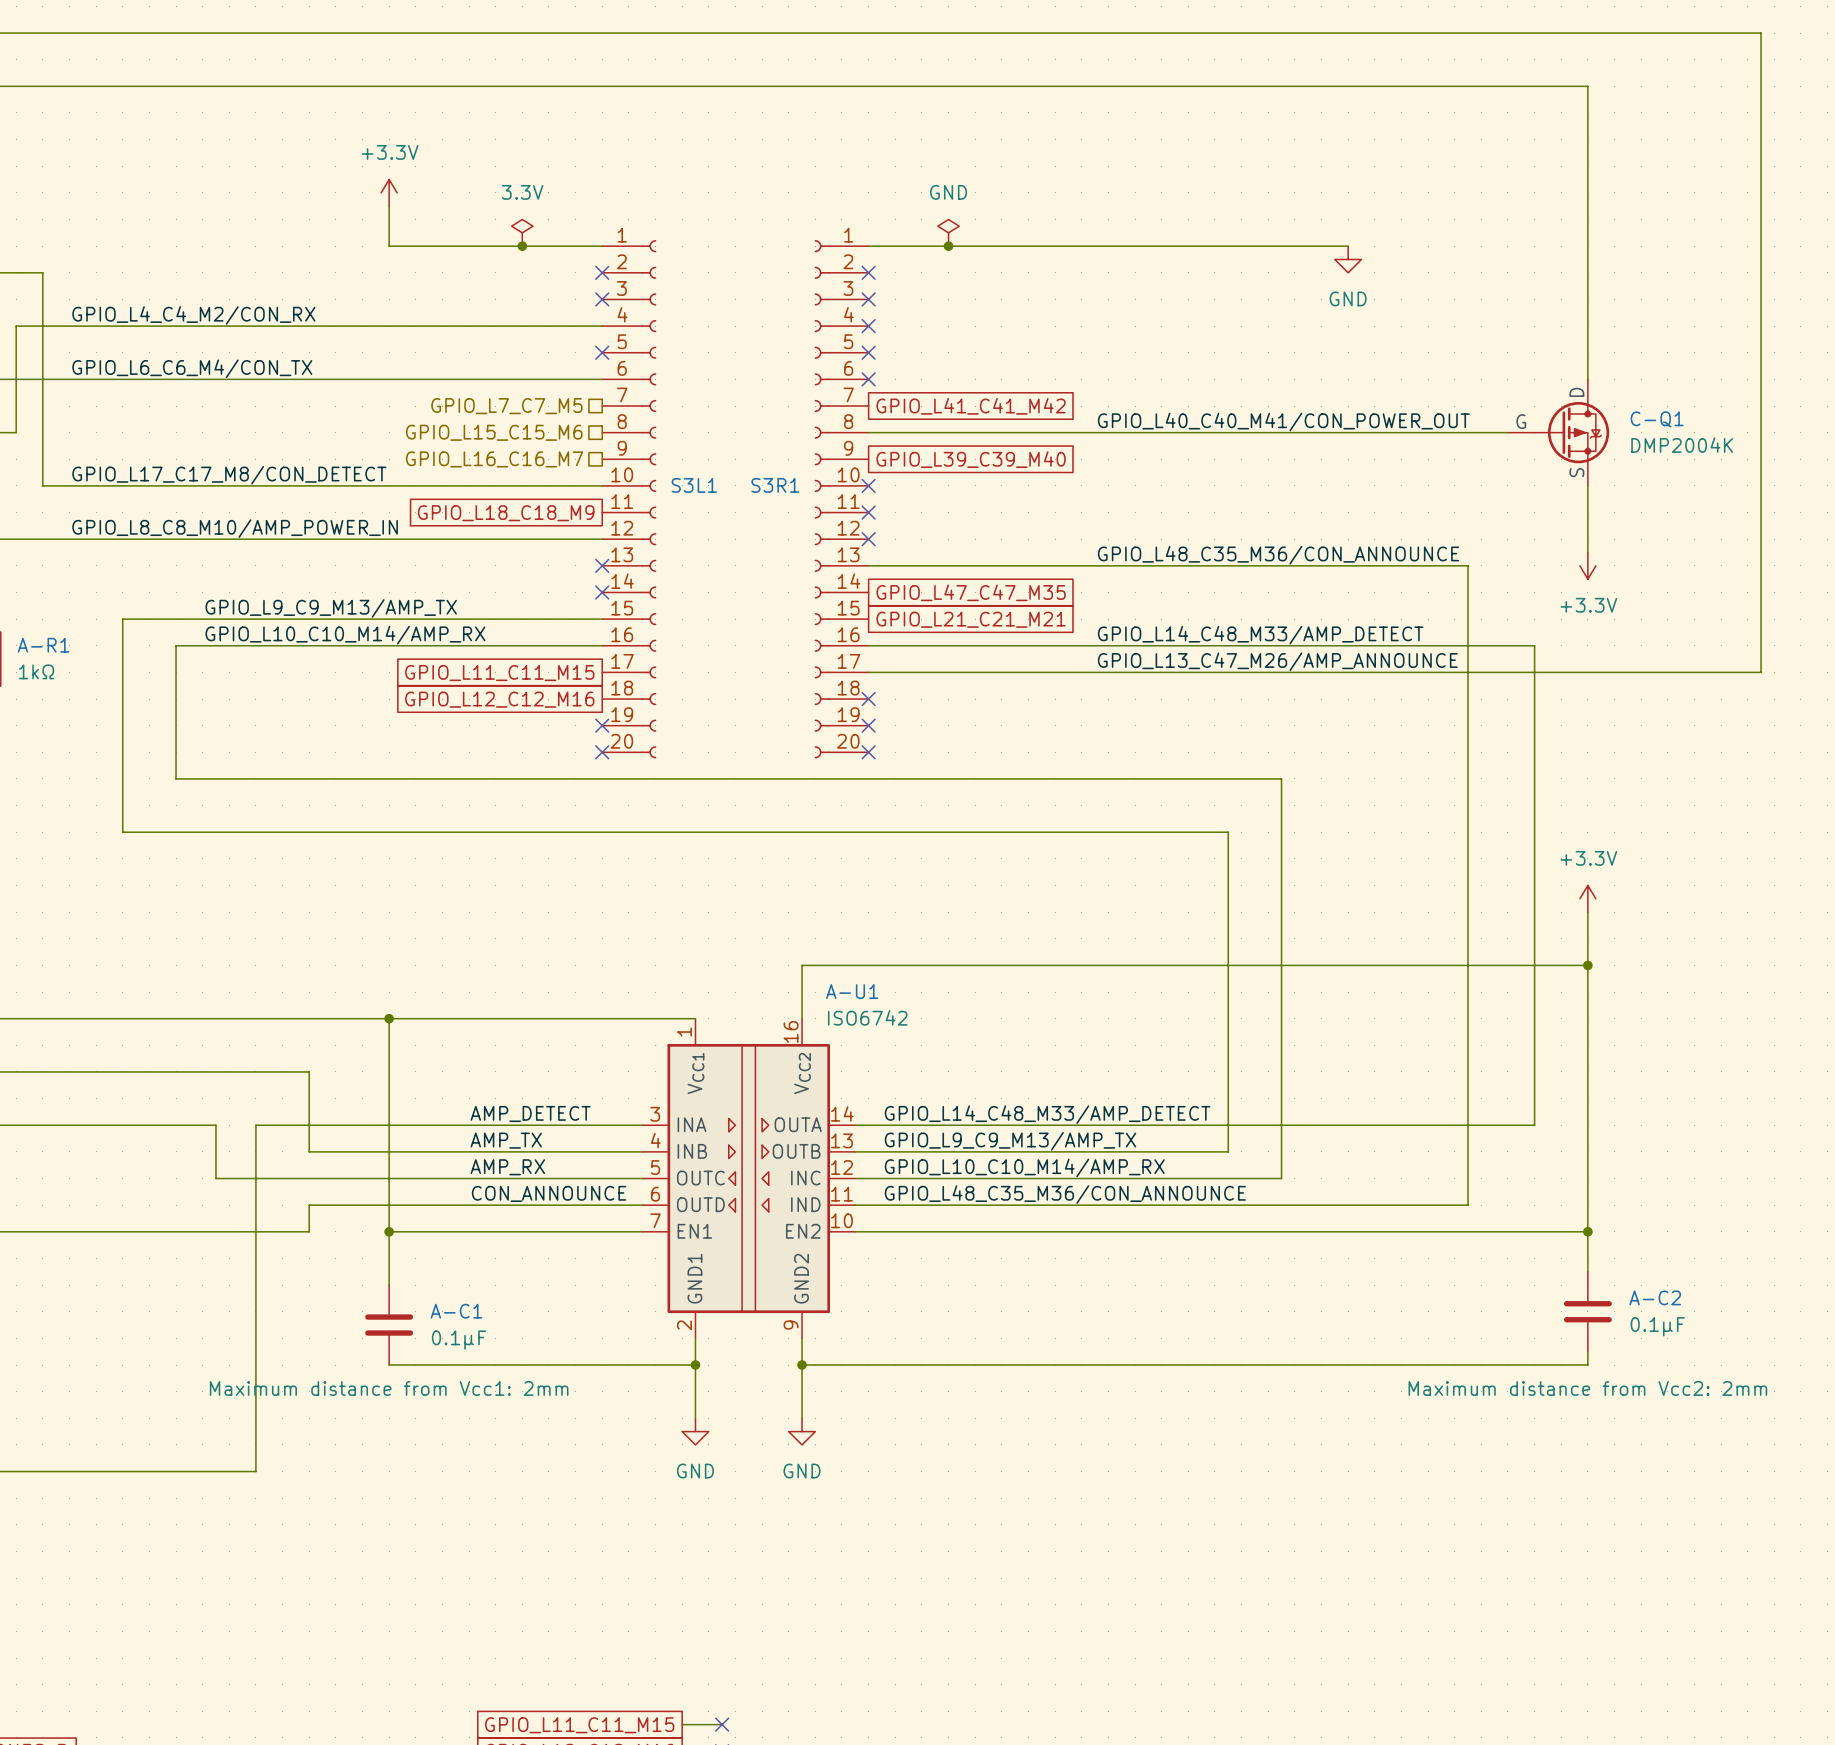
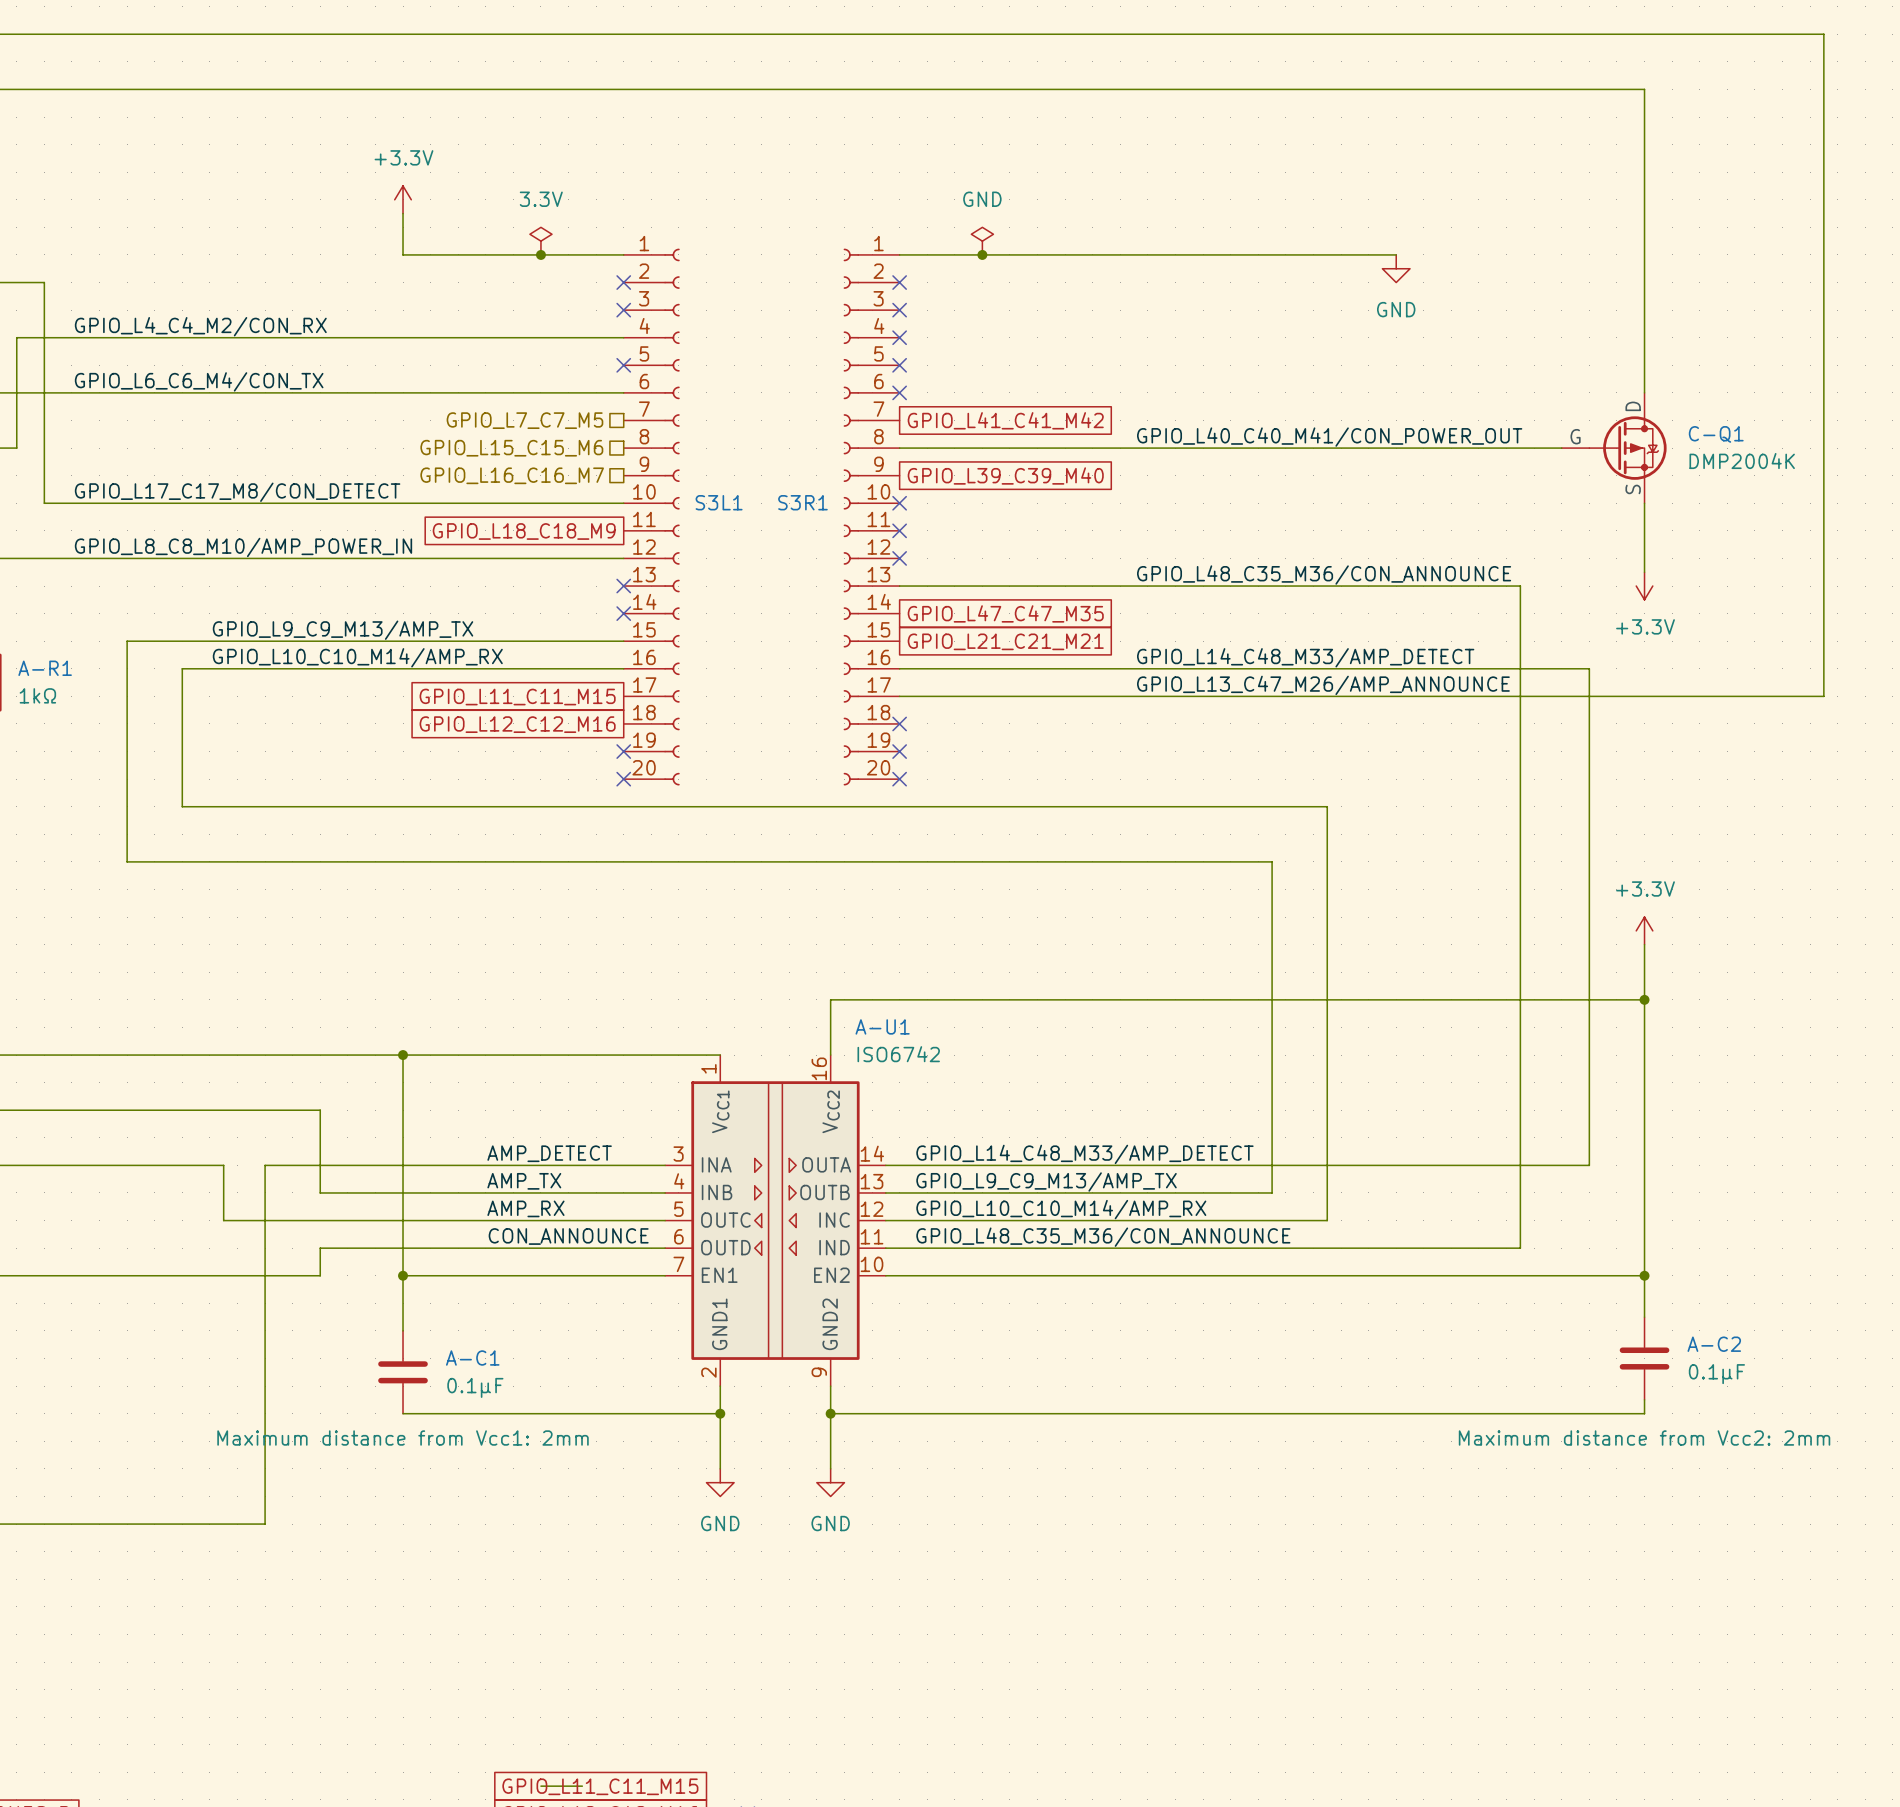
wire: (682, 1724) (722, 1724) -> (540, 1786) (582, 1786)
no-connect mark: (722, 1724) -> none

